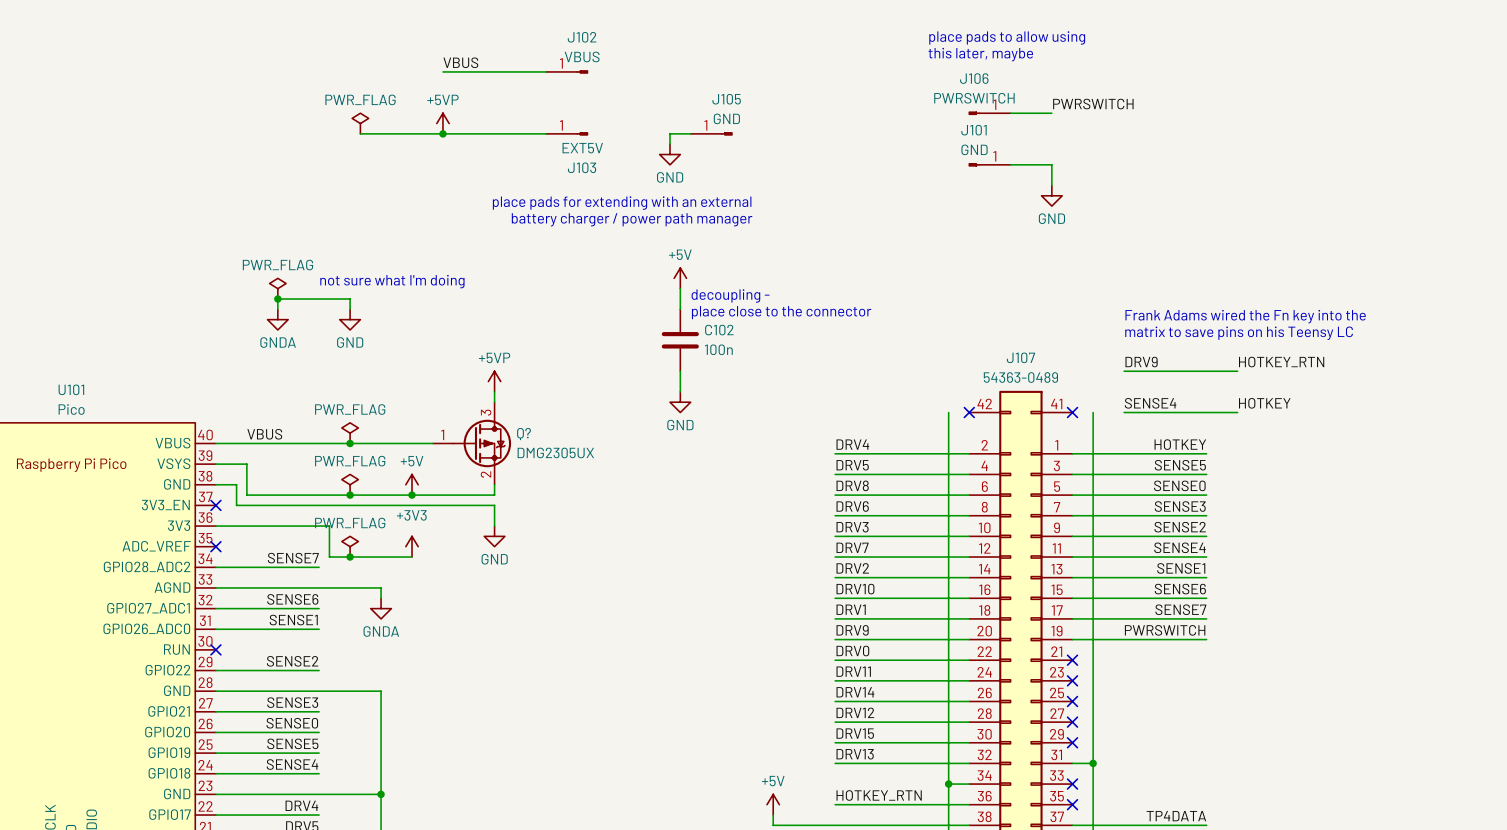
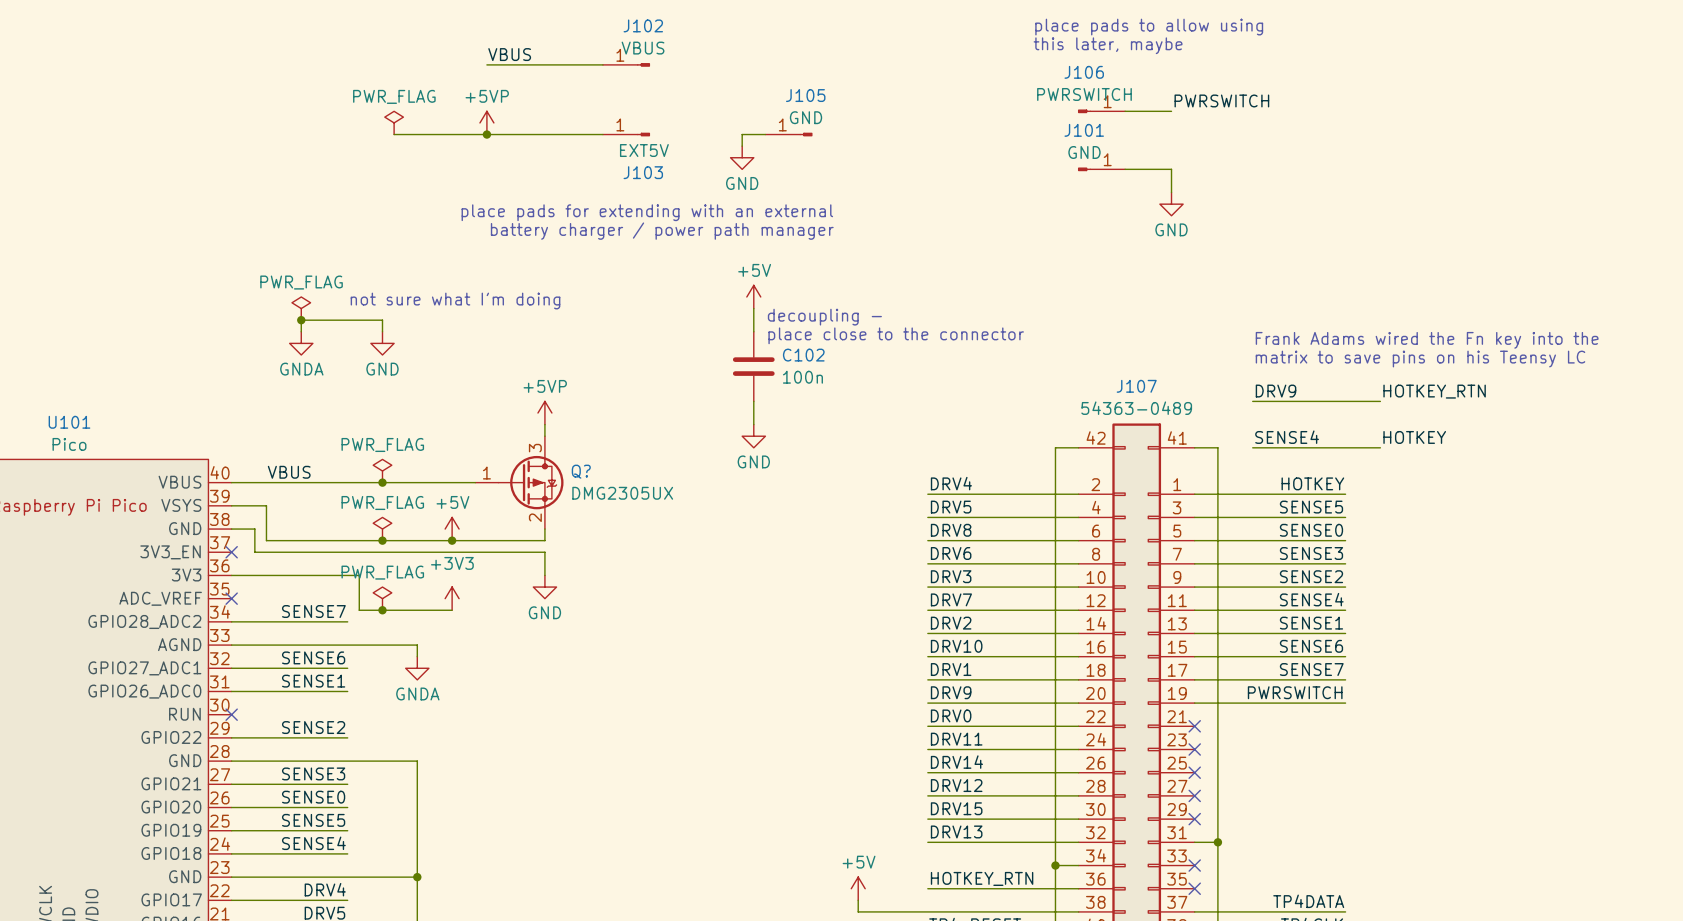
wire: none -> (1055, 447) (1078, 447)
no-connect mark: (969, 412) -> none
wire: none -> (1194, 447) (1217, 447)
no-connect mark: (1072, 412) -> none

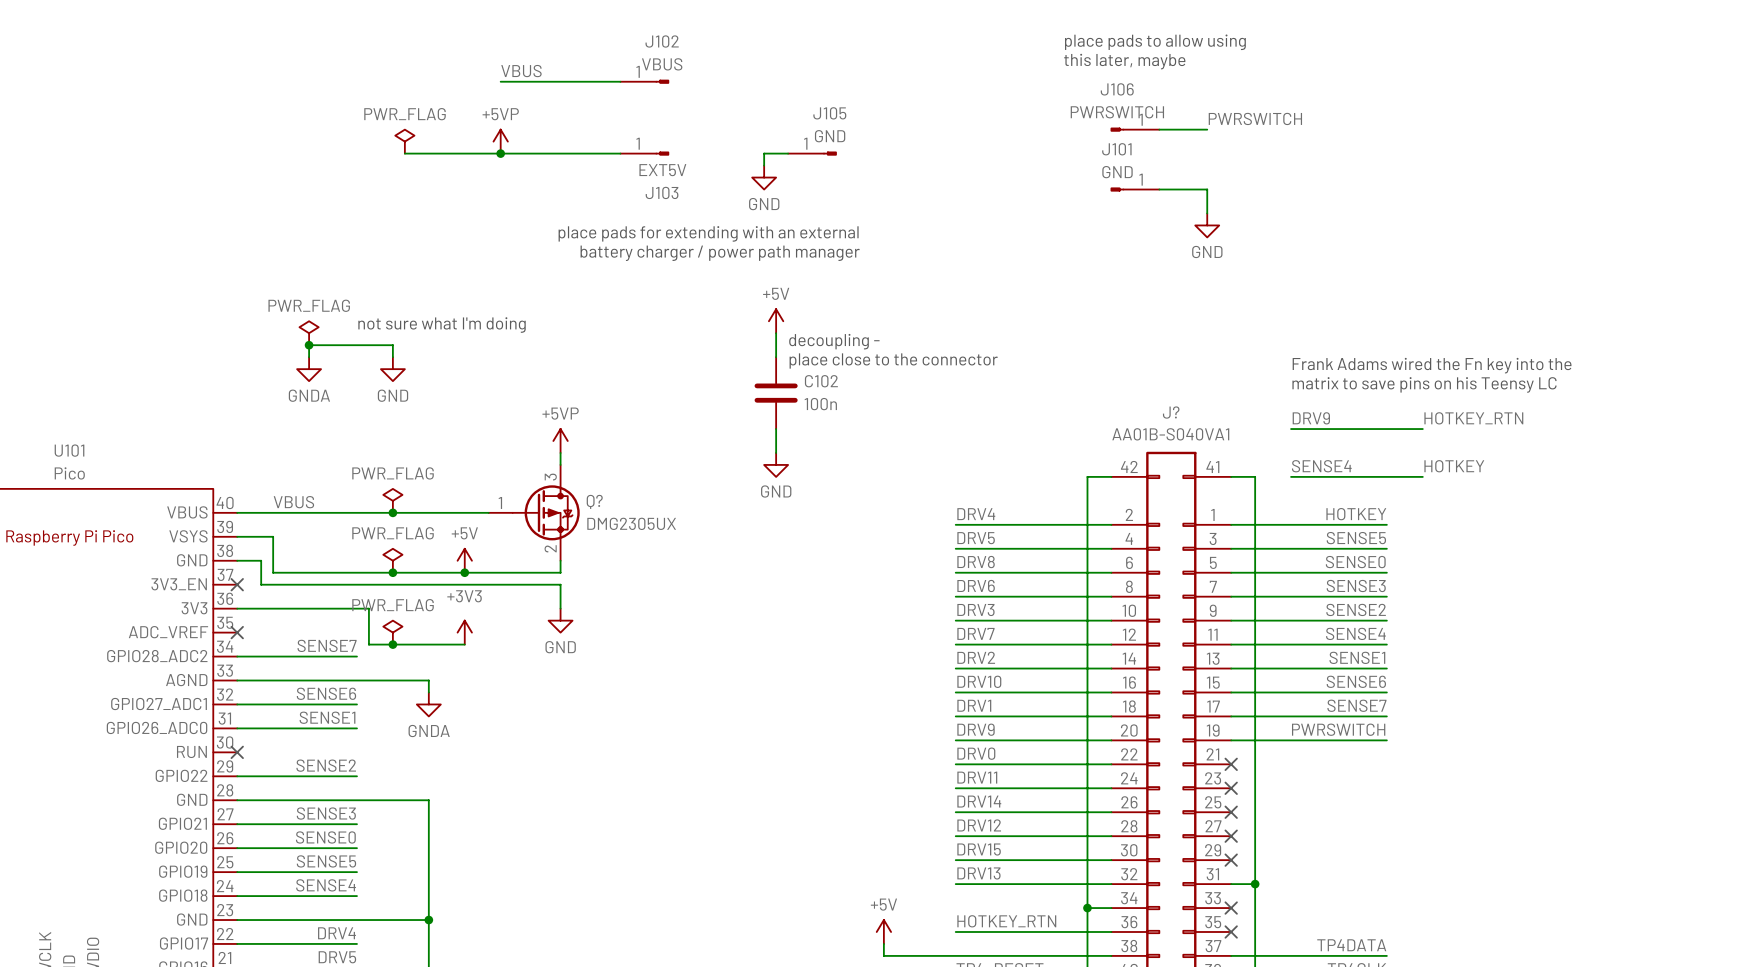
J107 name: J107 (1136, 386) -> J? (1171, 412)
J107 value: 54363-0489 (1136, 408) -> AA01B-S040VA1 (1170, 434)

